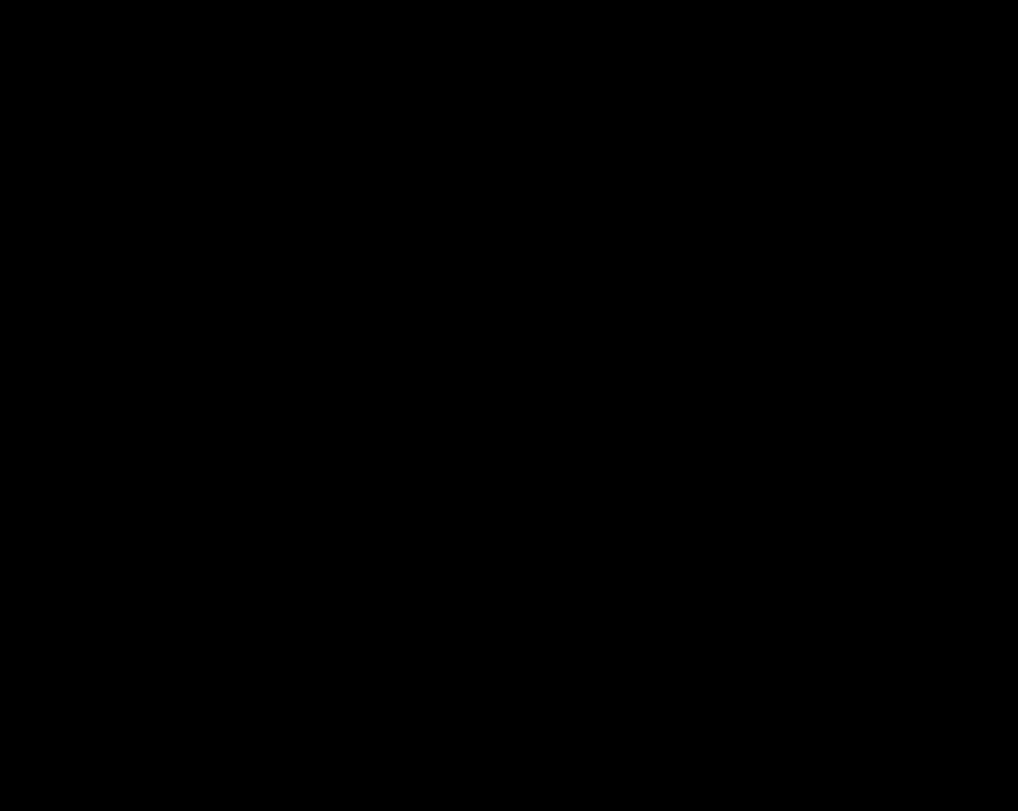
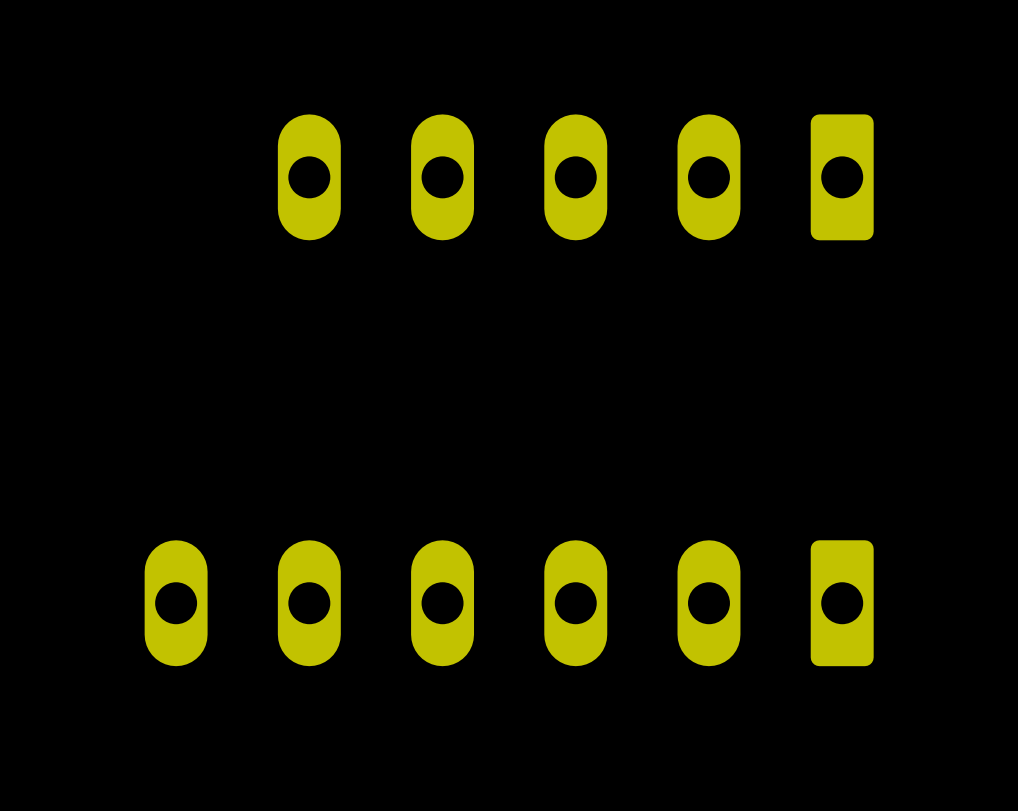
part: none -> (575, 177)
part: none -> (509, 603)

